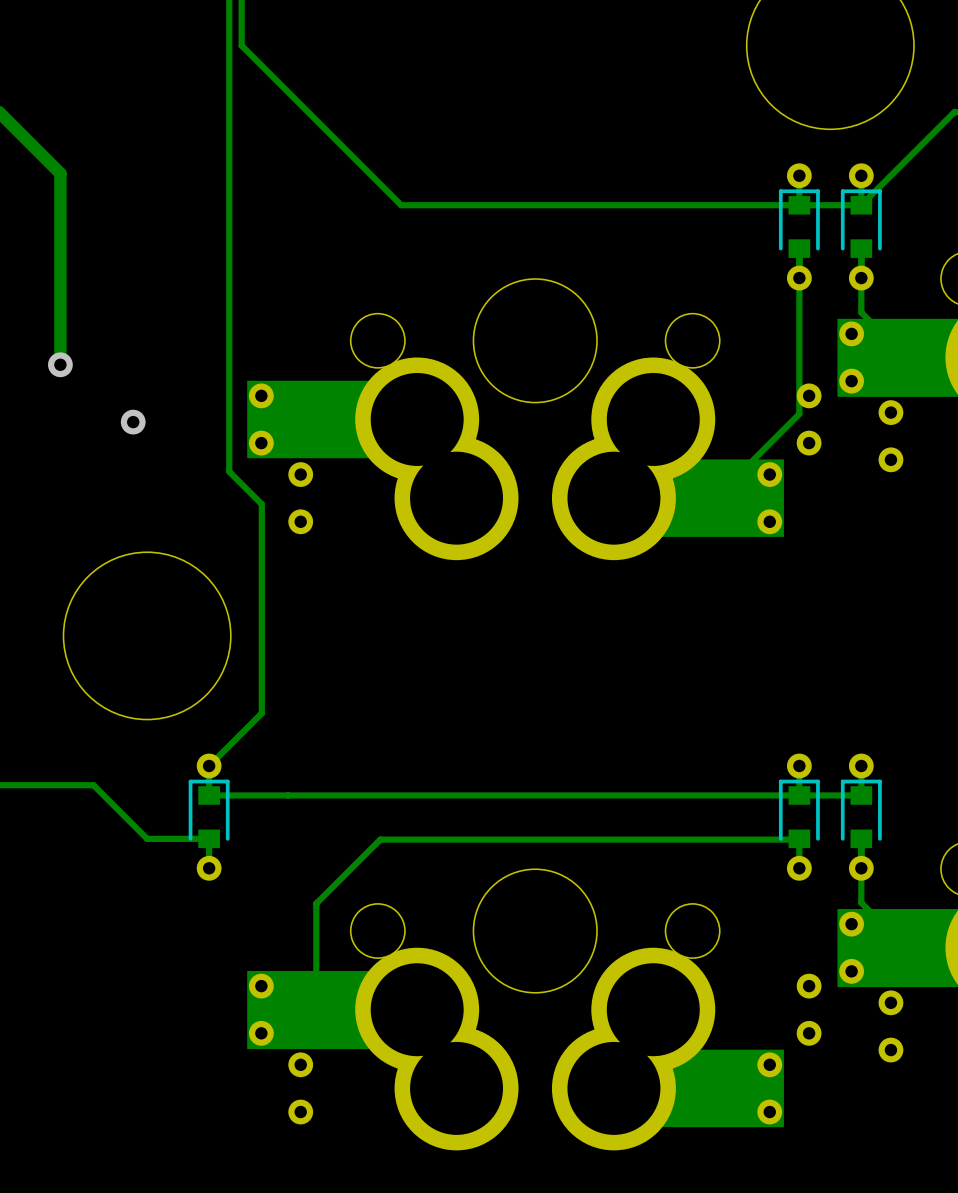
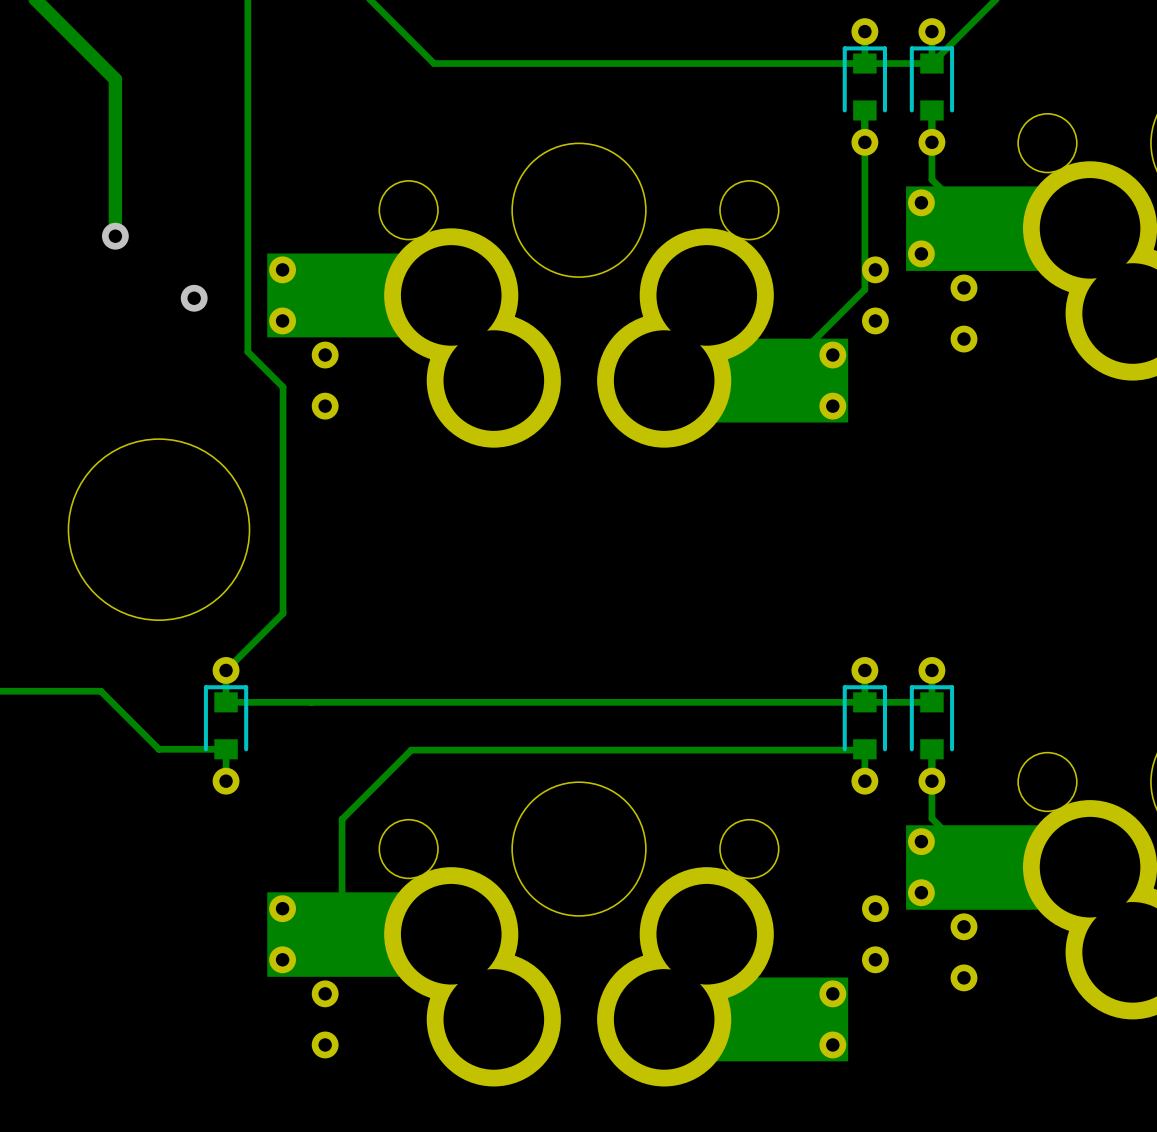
track: (60, 173) (60, 364) -> (65, 29) (115, 79) (115, 236)
via: (60, 364) -> none
via: none -> (115, 236)
via: (133, 422) -> none
via: none -> (194, 298)

